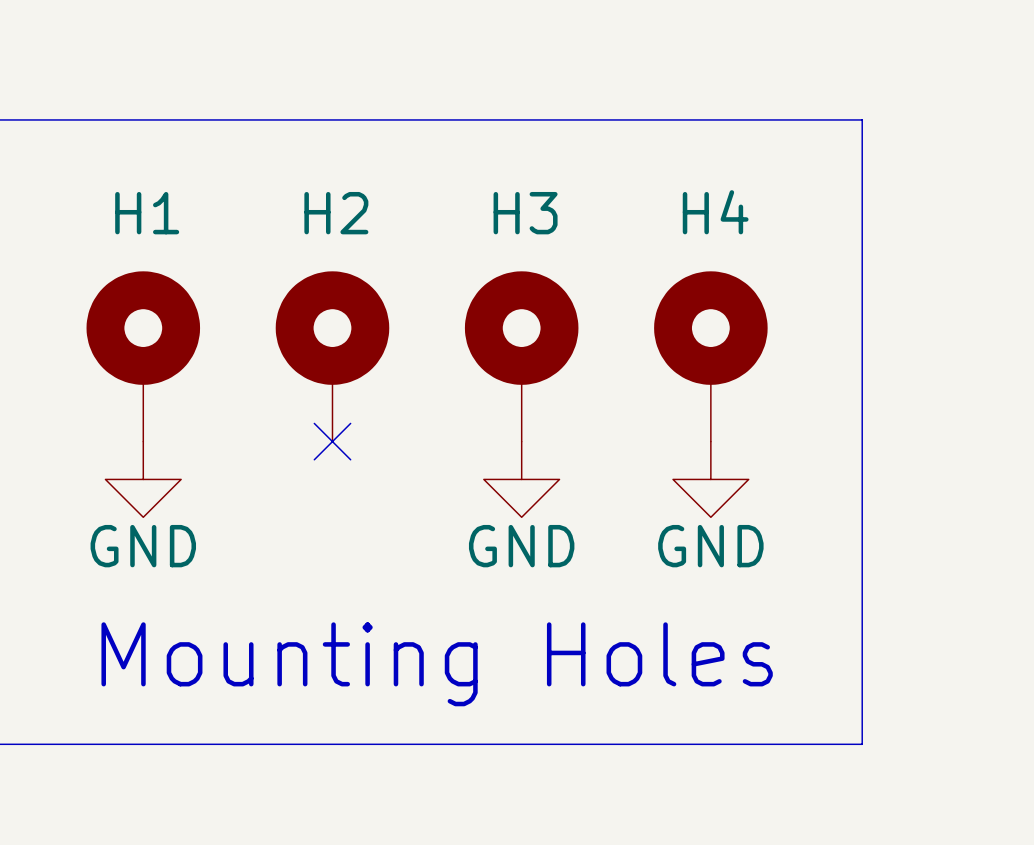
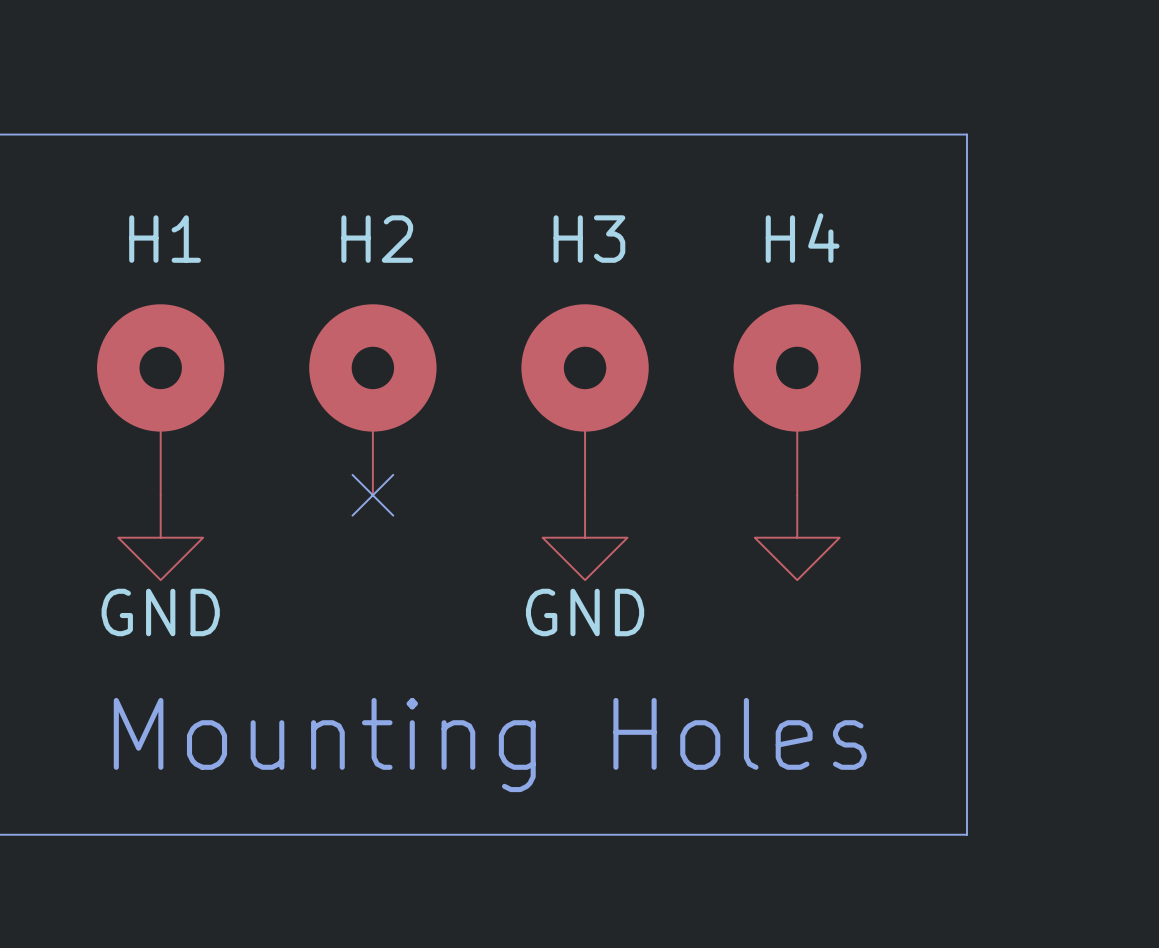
power symbol text: GND (710, 546) -> none

